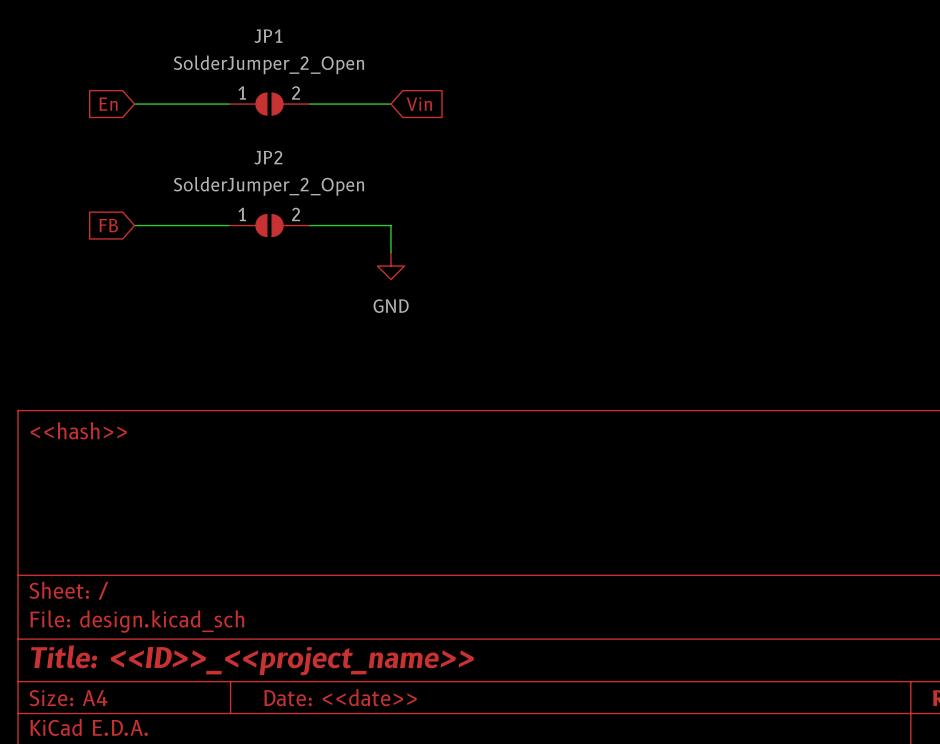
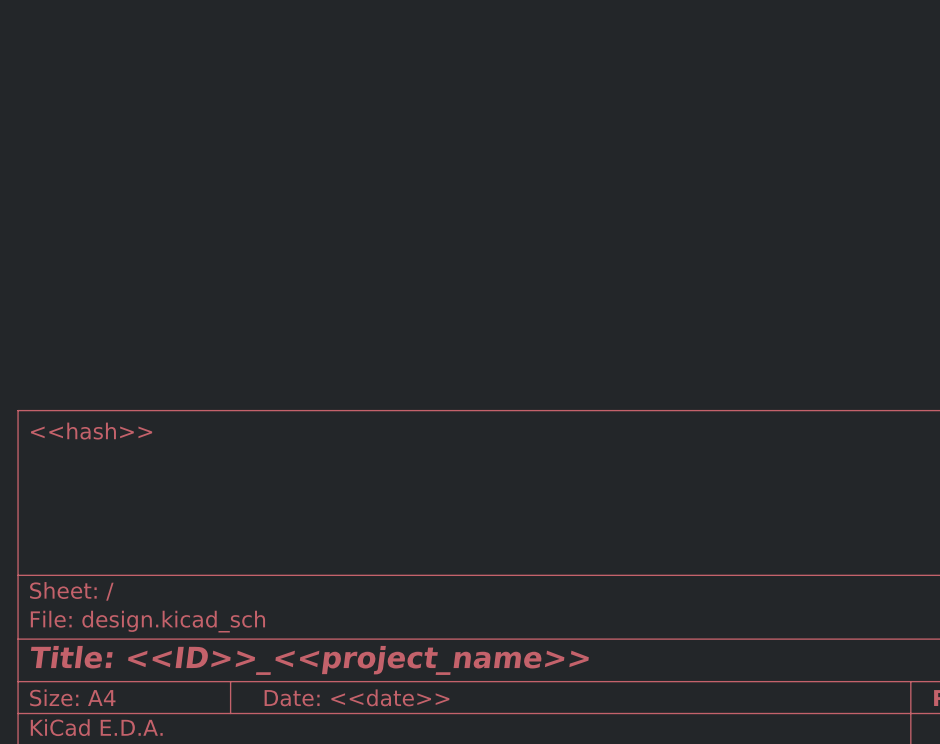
global label: En (108, 104) -> none
wire: (134, 104) (229, 104) -> none
JP1: SolderJumper_2_Open (269, 104) -> none
wire: (309, 104) (390, 104) -> none
global label: Vin (419, 104) -> none
global label: FB (108, 225) -> none
wire: (134, 225) (229, 225) -> none
JP2: SolderJumper_2_Open (269, 225) -> none
wire: (309, 225) (390, 225) (390, 252) -> none
power symbol: GND (390, 266) -> none

